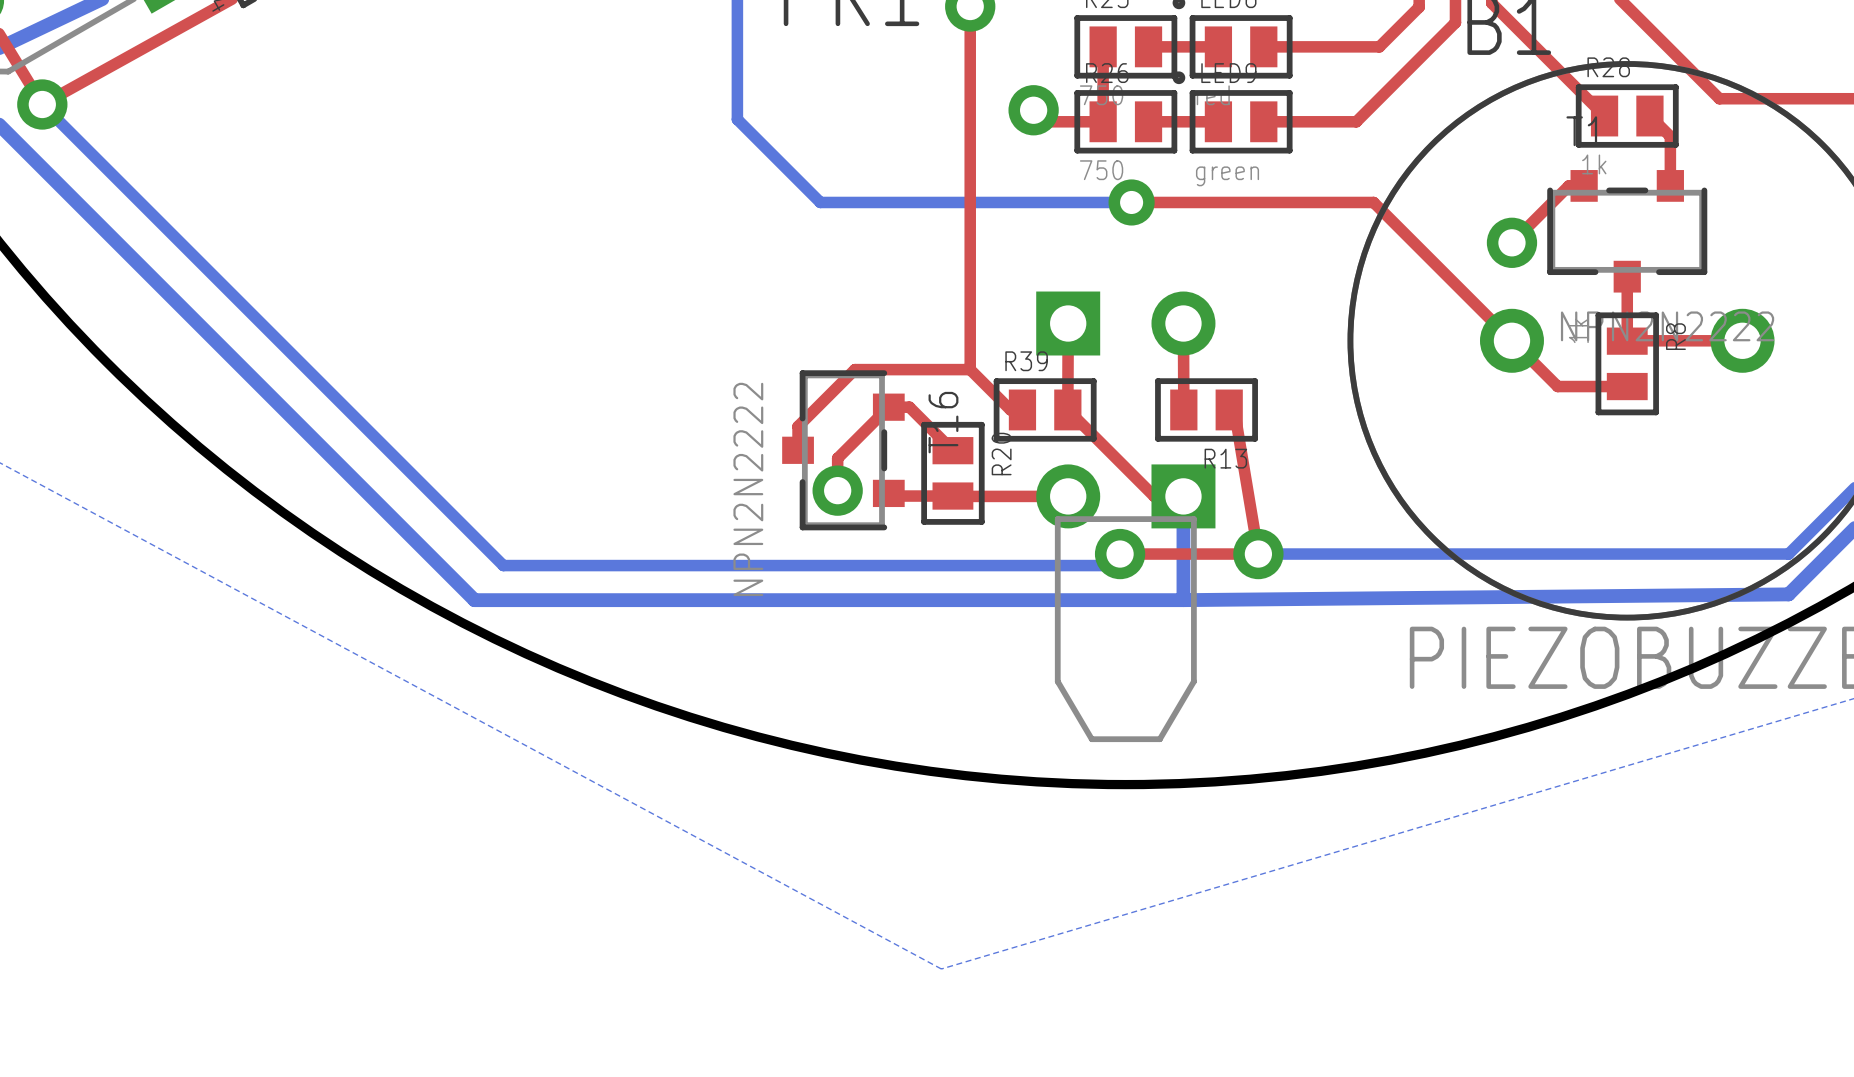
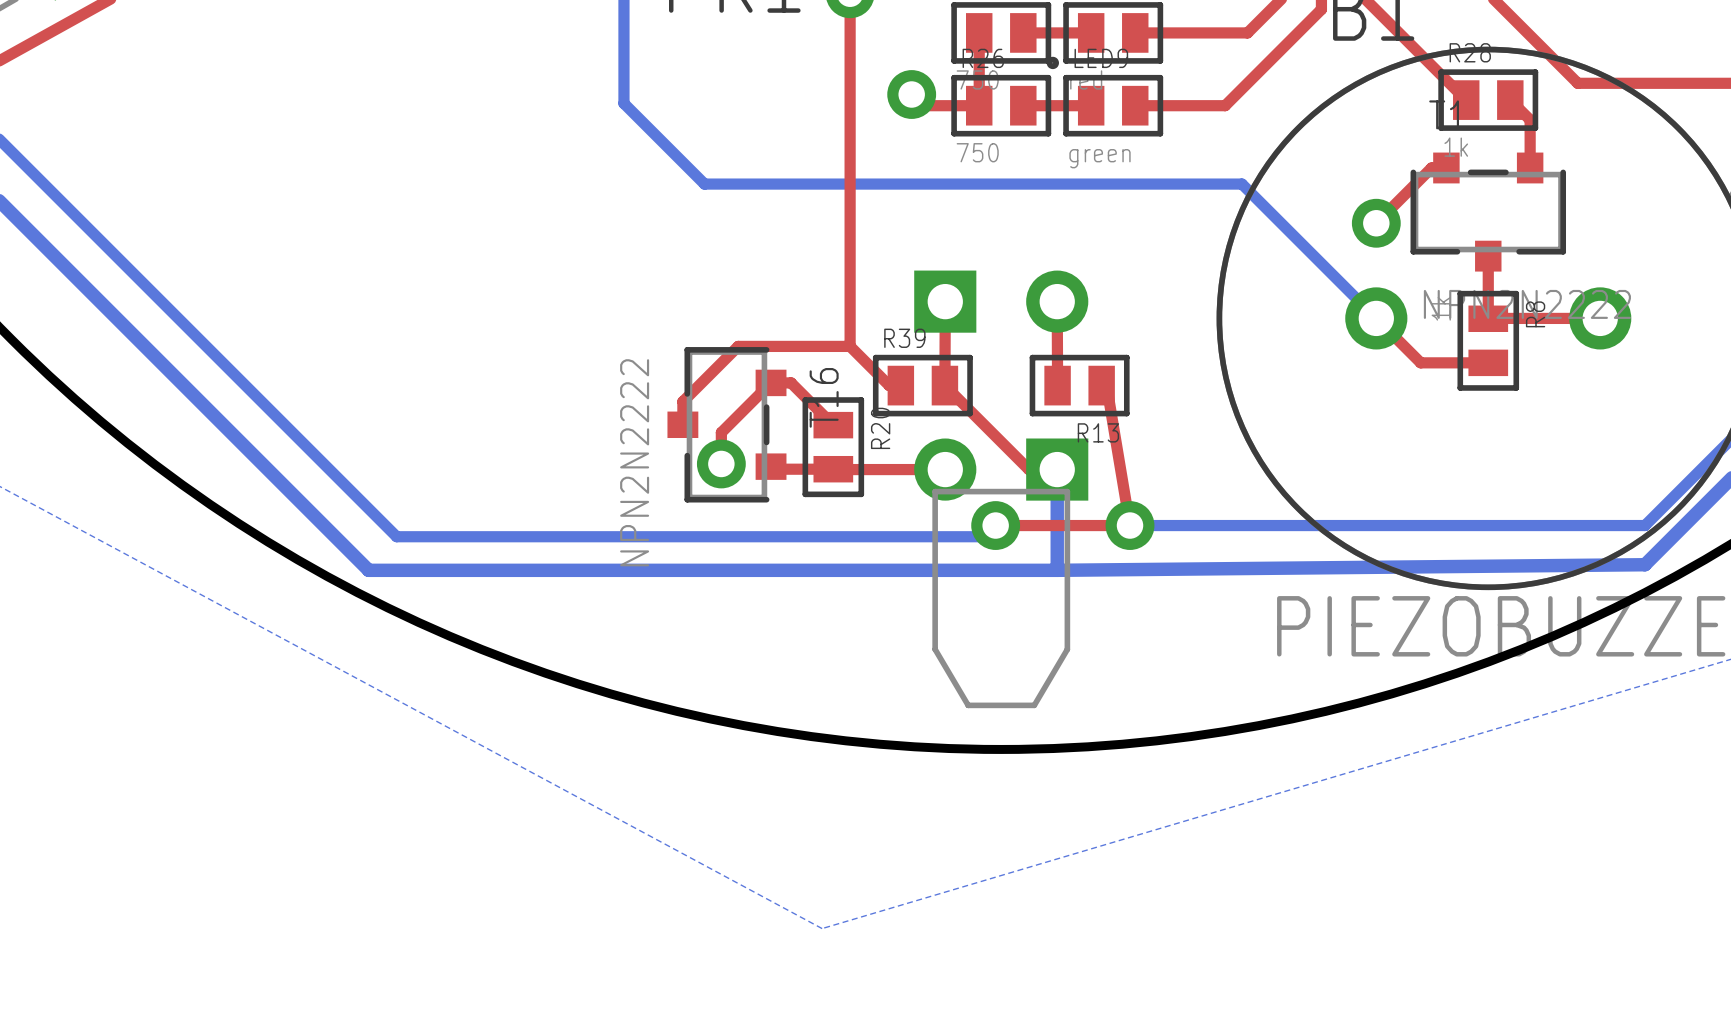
bottom track: none -> (1006, 184) (1241, 184) (1376, 318)
top track: (1131, 202) (1373, 202) (1511, 340) -> none
via: (1131, 202) -> none

